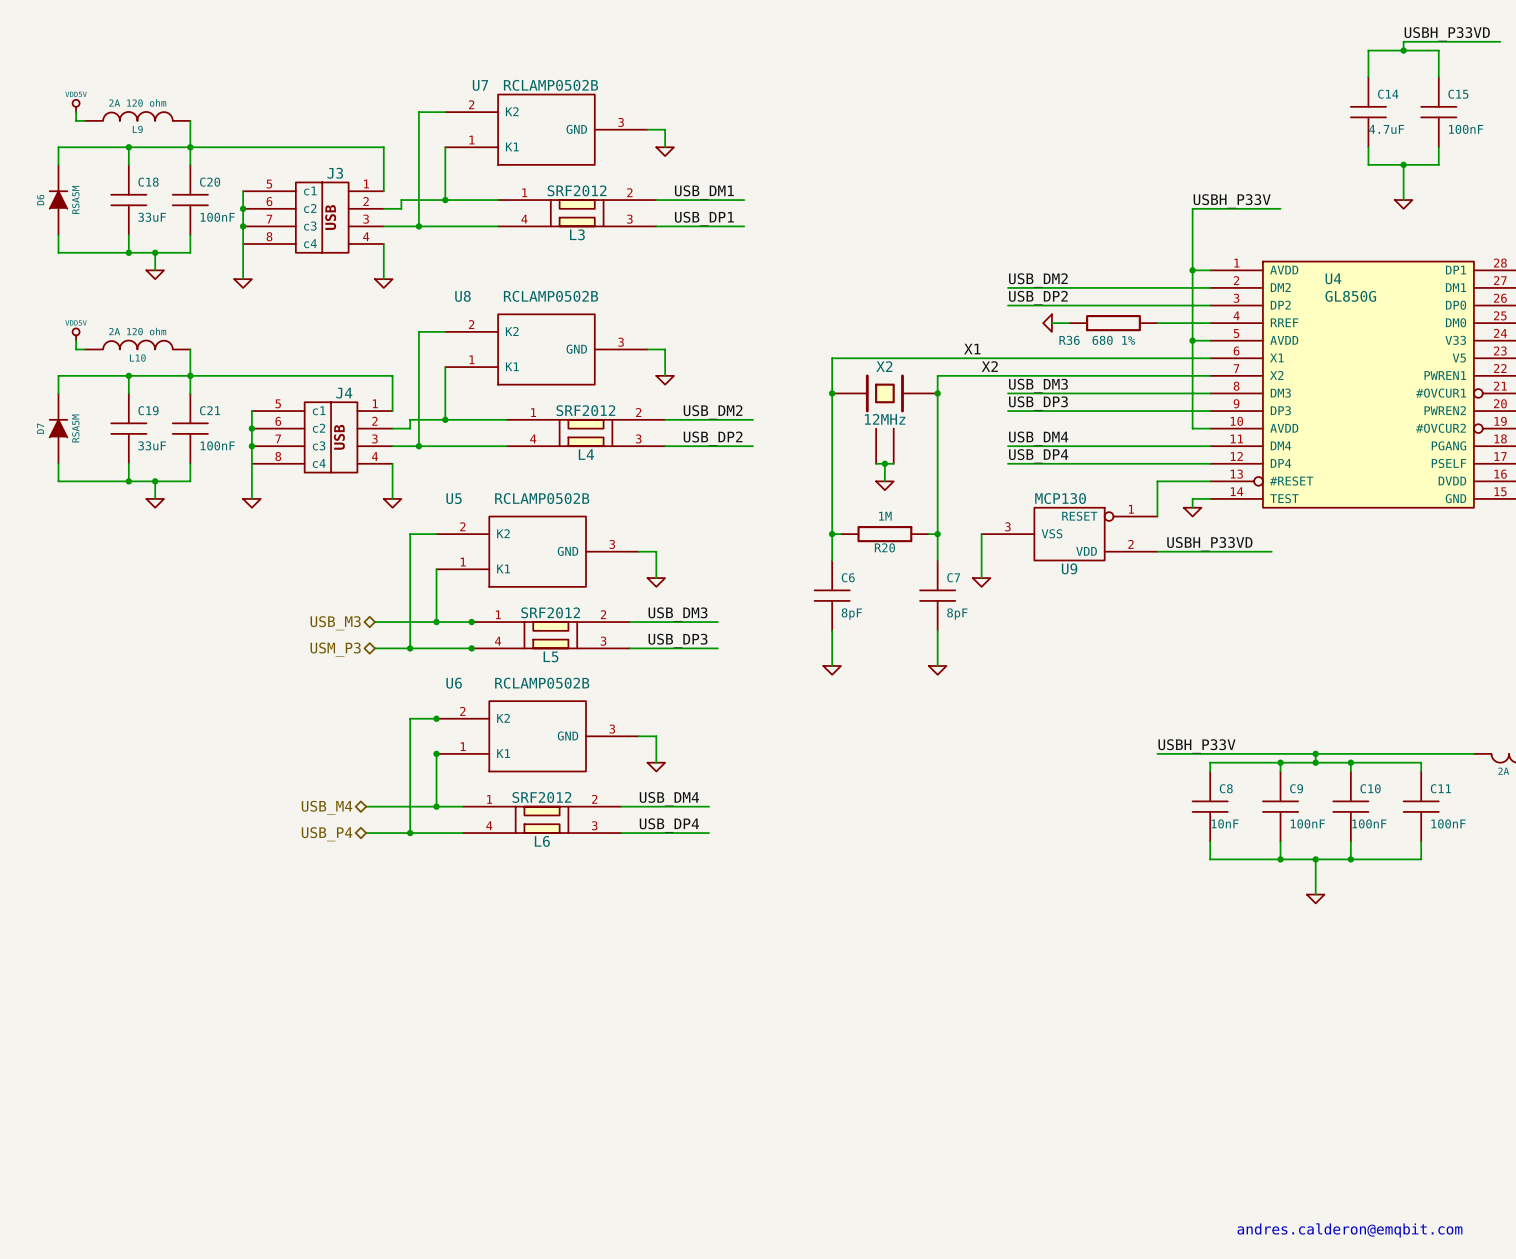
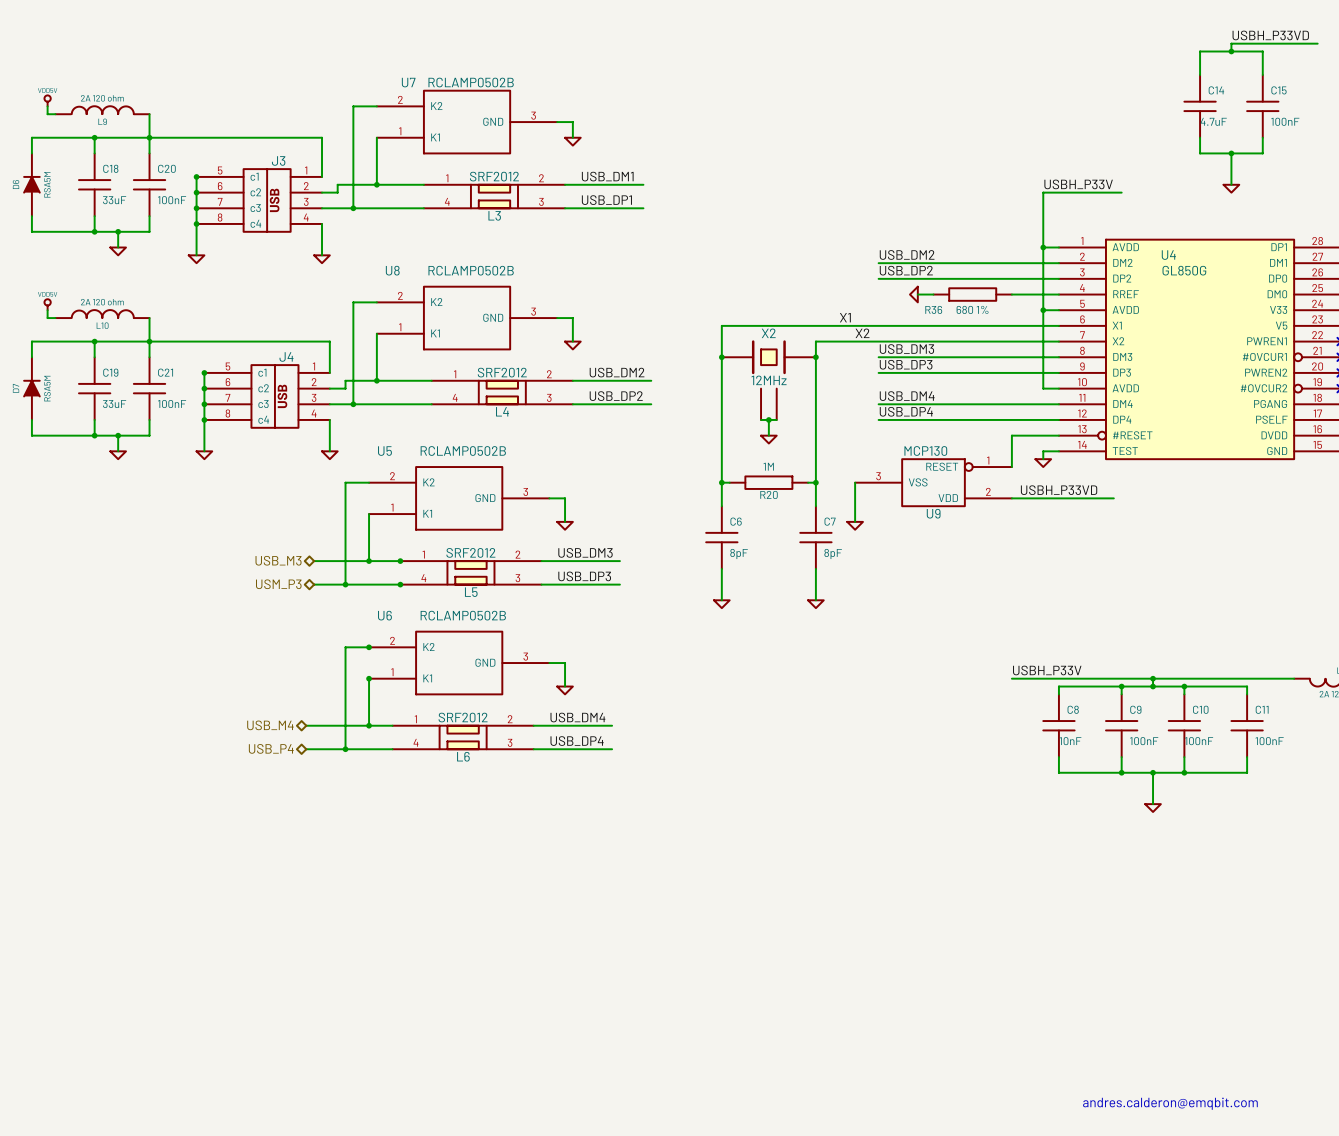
junction: none -> (196, 176)
junction: none -> (196, 223)
junction: none -> (204, 372)
junction: none -> (204, 419)

